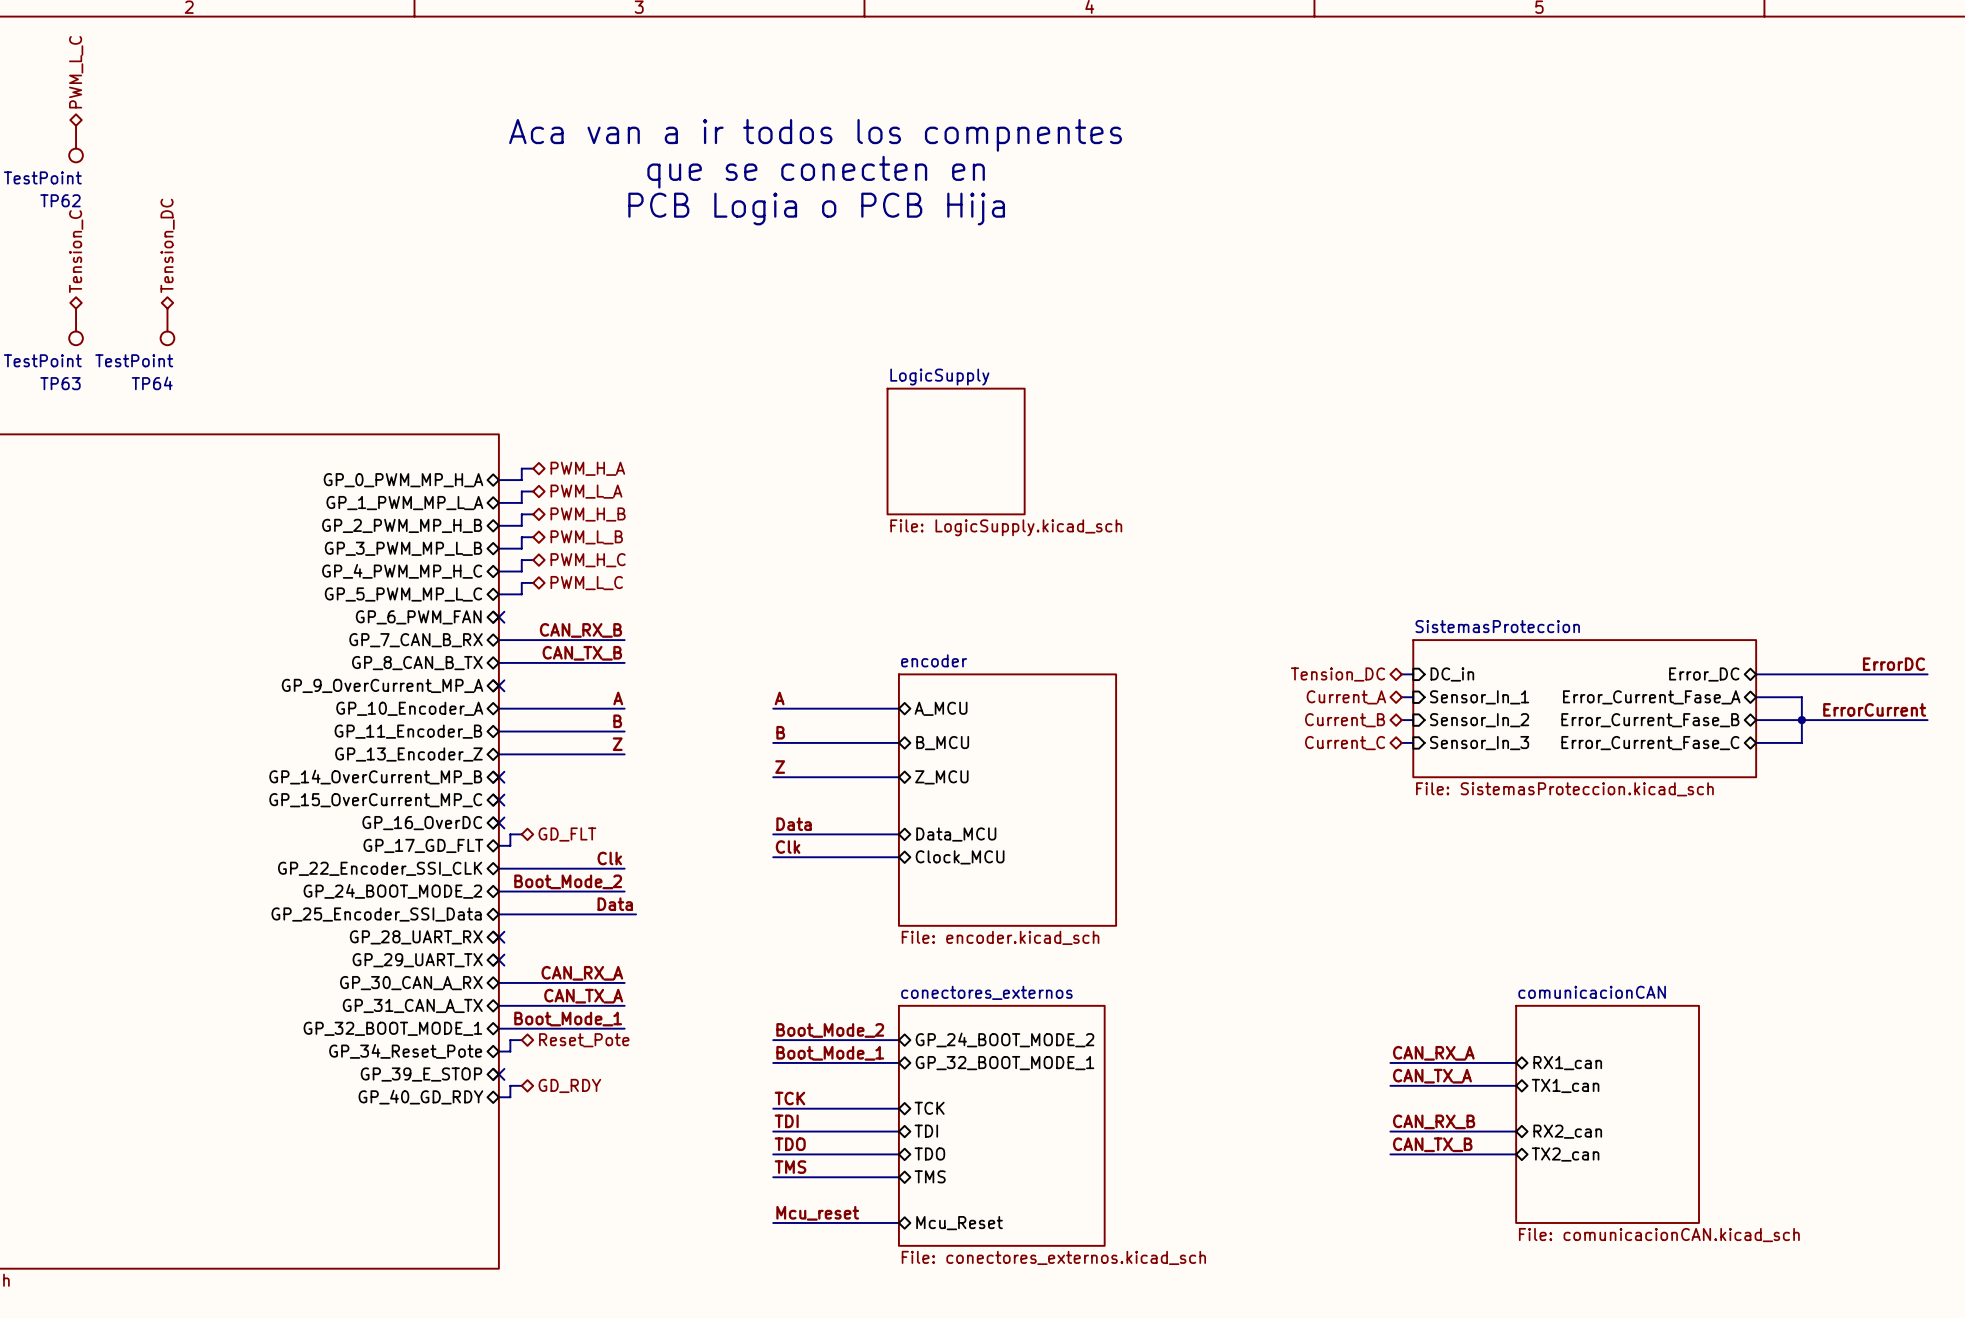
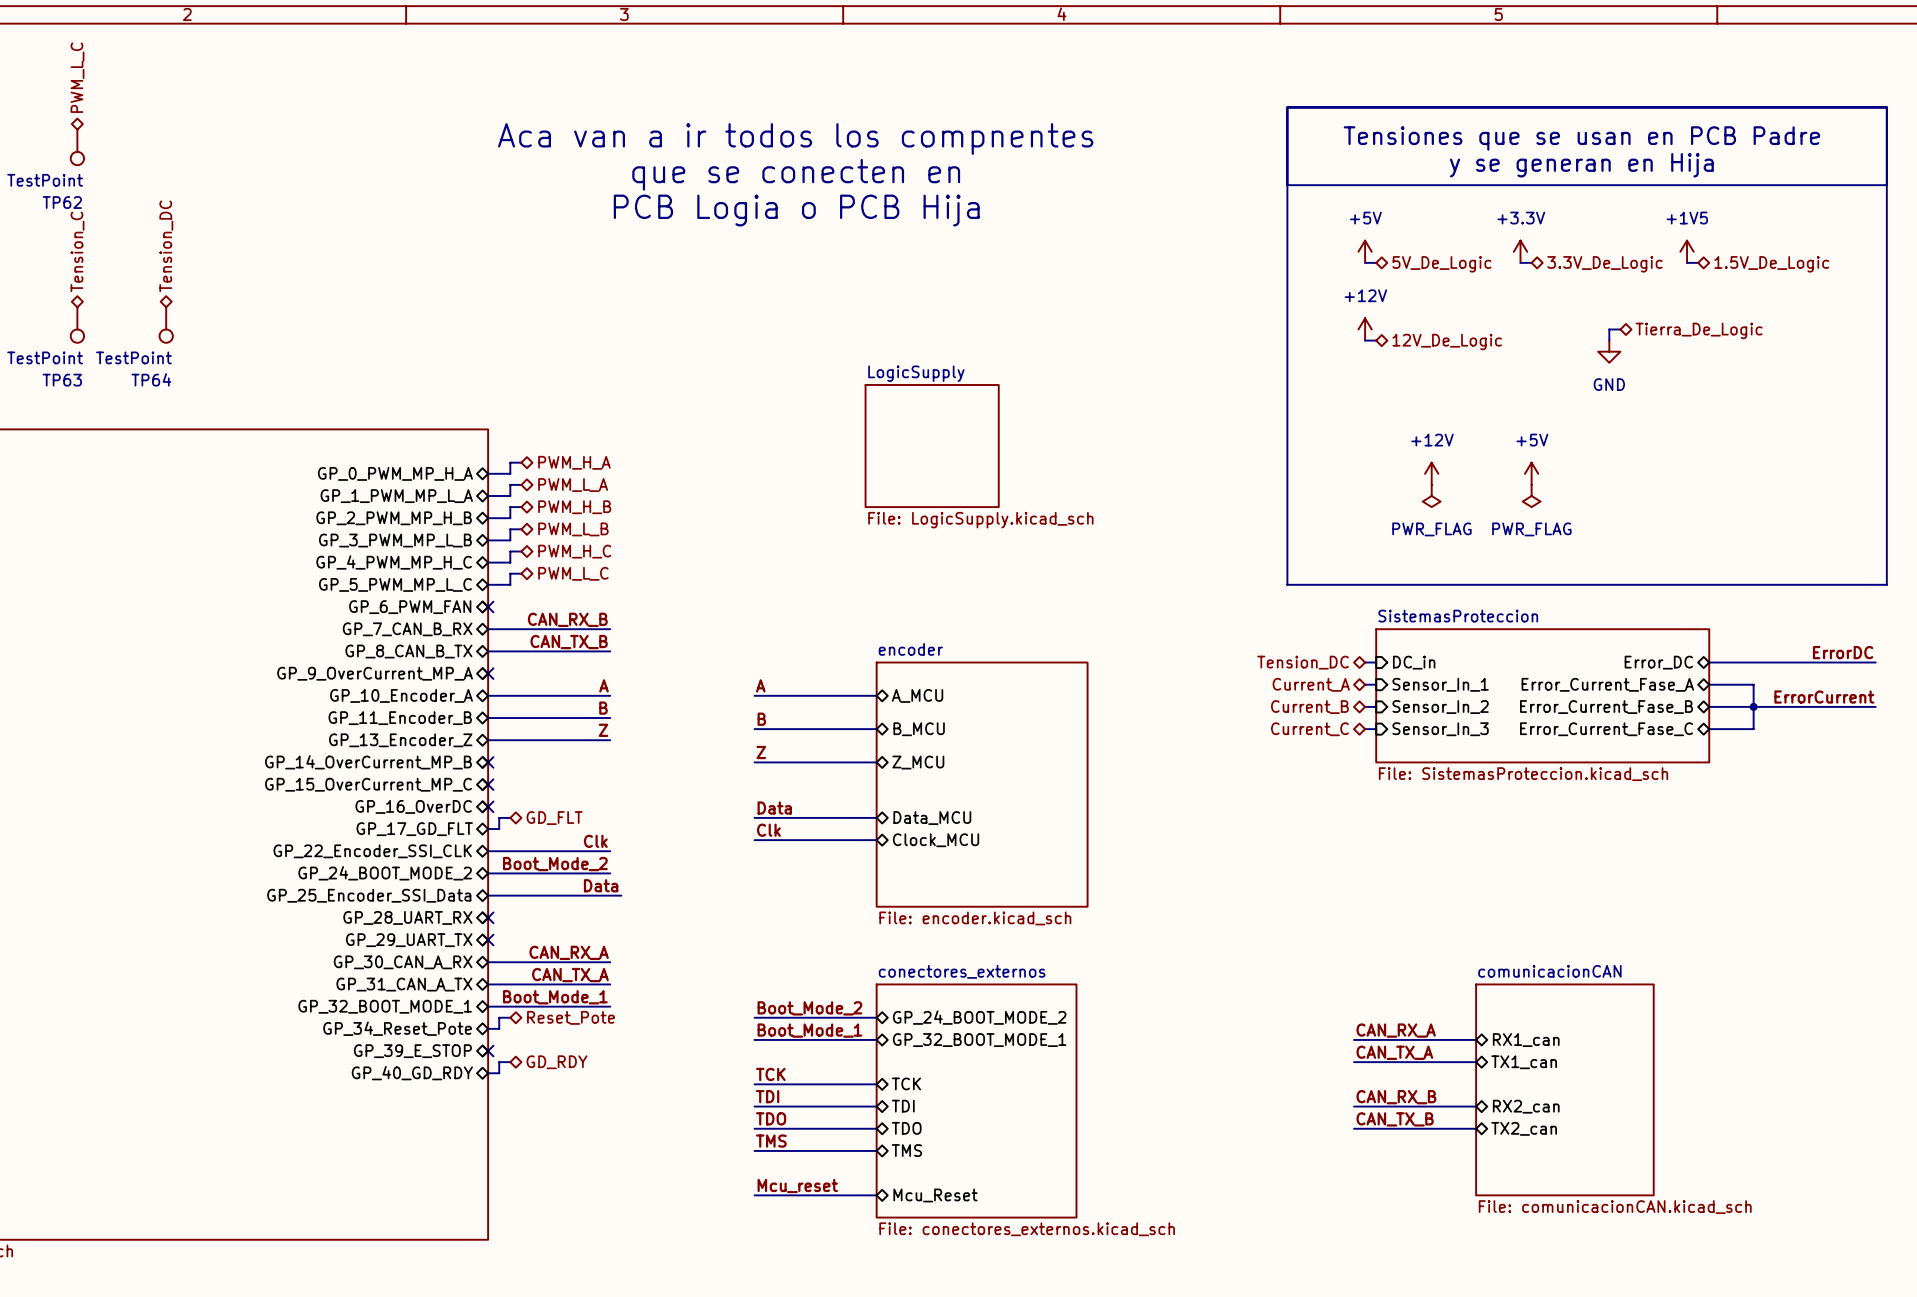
line: none -> (1287, 107) (1886, 107) (1886, 584) (1287, 584) (1287, 107)
text: none -> Tensiones que se usan en PCB Padre (1581, 138)
text: none -> y se generan en Hija (1581, 165)
line: none -> (1287, 185) (1886, 185)
power symbol: none -> +5V (1365, 251)
power symbol: none -> +3.3V (1520, 251)
power symbol: none -> +1V5 (1687, 251)
wire: none -> (1365, 262) (1376, 262)
wire: none -> (1520, 262) (1531, 262)
wire: none -> (1687, 262) (1698, 262)
hierarchical label: none -> 5V_De_Logic (1441, 264)
hierarchical label: none -> 3.3V_De_Logic (1605, 264)
hierarchical label: none -> 1.5V_De_Logic (1771, 264)
power symbol: none -> +12V (1365, 329)
wire: none -> (1620, 329) (1609, 329) (1609, 340)
hierarchical label: none -> Tierra_De_Logic (1699, 330)
wire: none -> (1365, 340) (1376, 340)
hierarchical label: none -> 12V_De_Logic (1447, 342)
power symbol: none -> GND (1609, 351)
power symbol: none -> +12V (1431, 473)
power symbol: none -> +5V (1531, 473)
power symbol: none -> PWR_FLAG (1431, 496)
power symbol: none -> PWR_FLAG (1531, 496)

